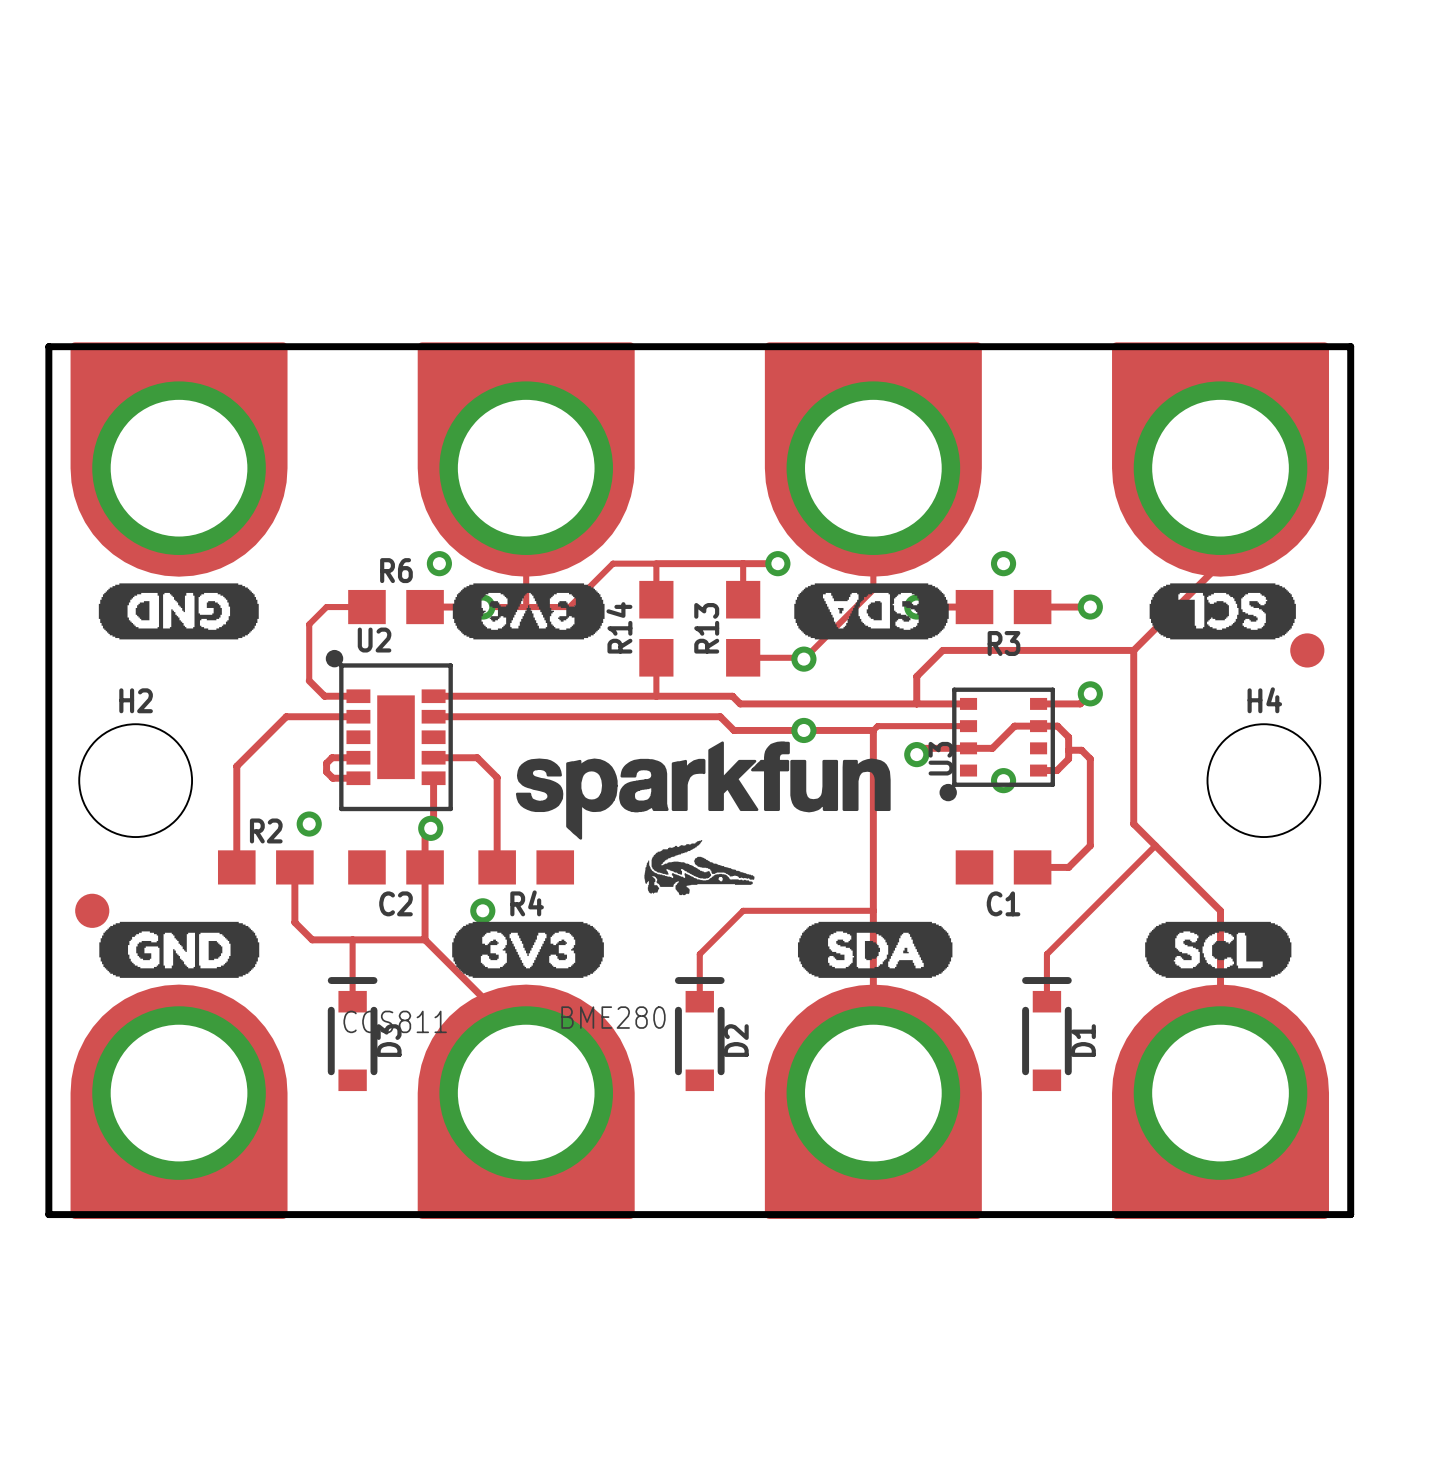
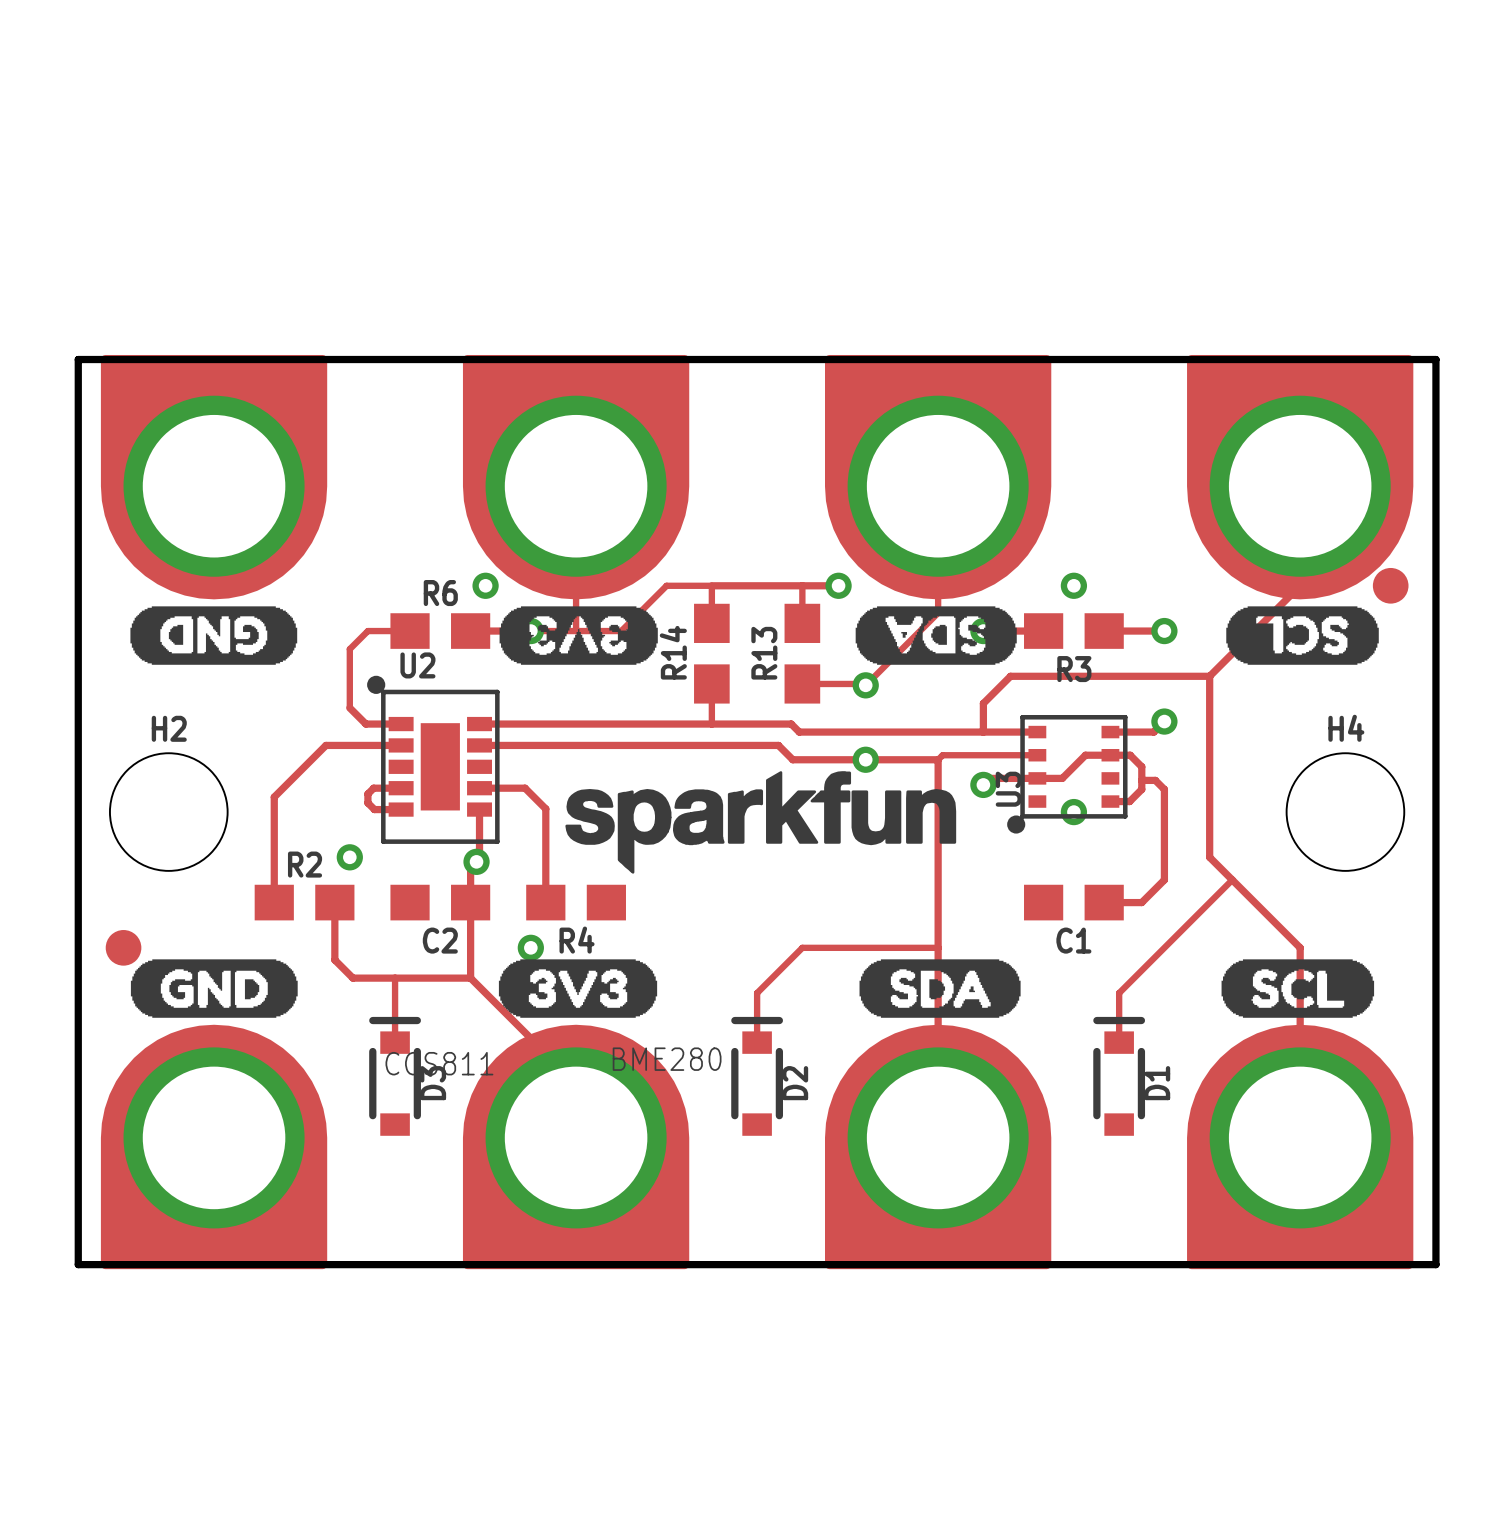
part position: (1307, 650) -> (1390, 585)
drawing: [644, 840, 755, 896] -> none

